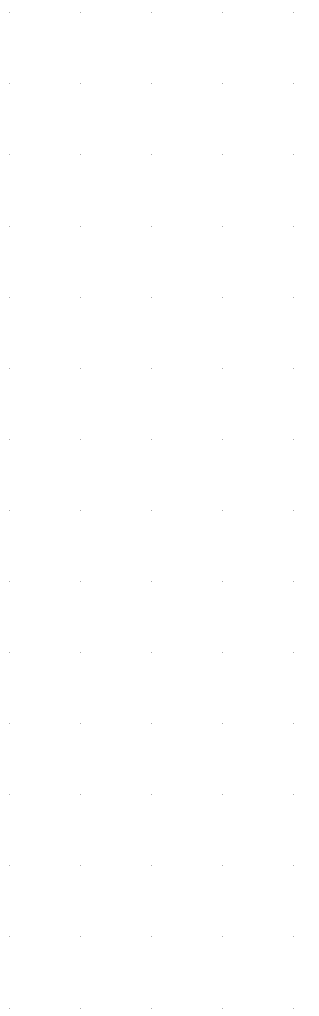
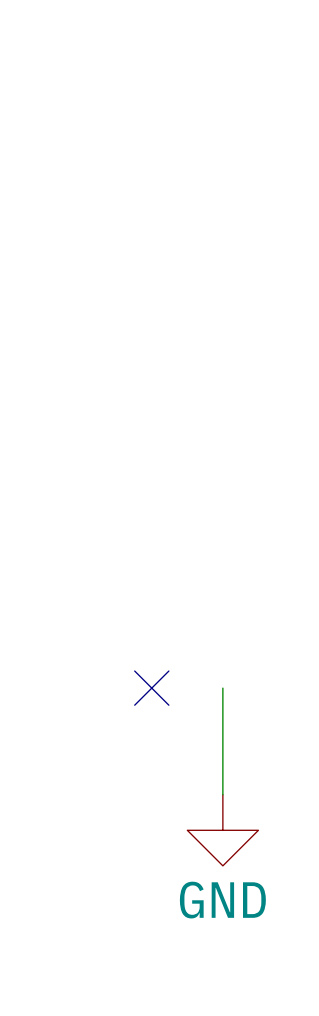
no-connect mark: none -> (151, 688)
wire: none -> (222, 688) (222, 794)
power symbol: none -> GND (222, 830)

